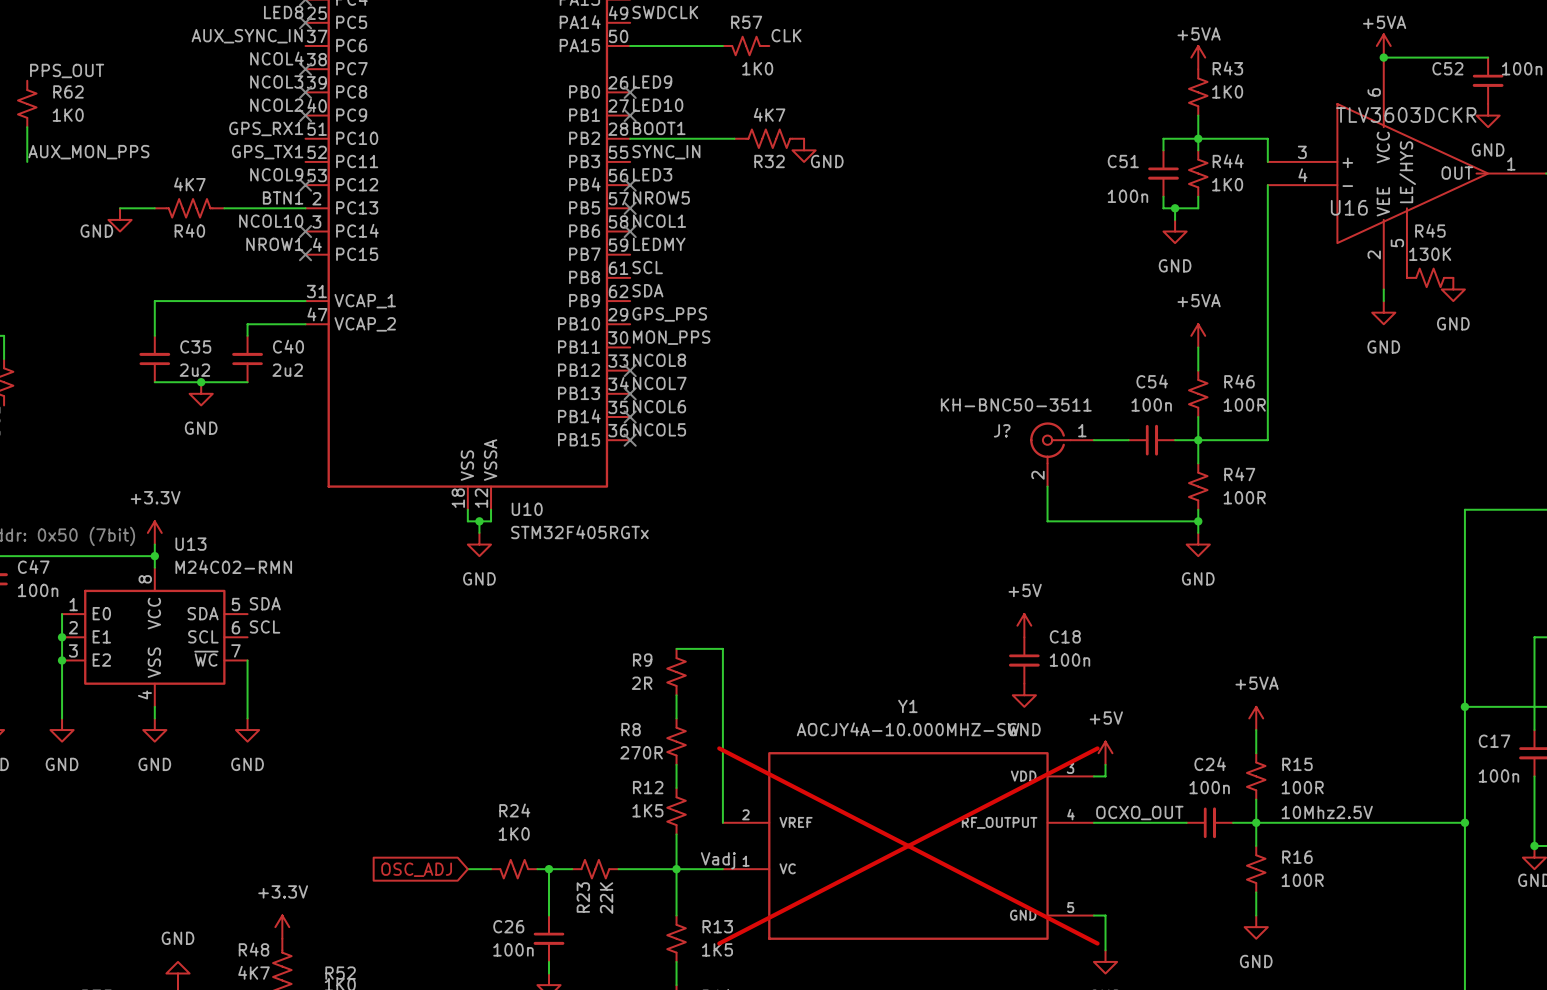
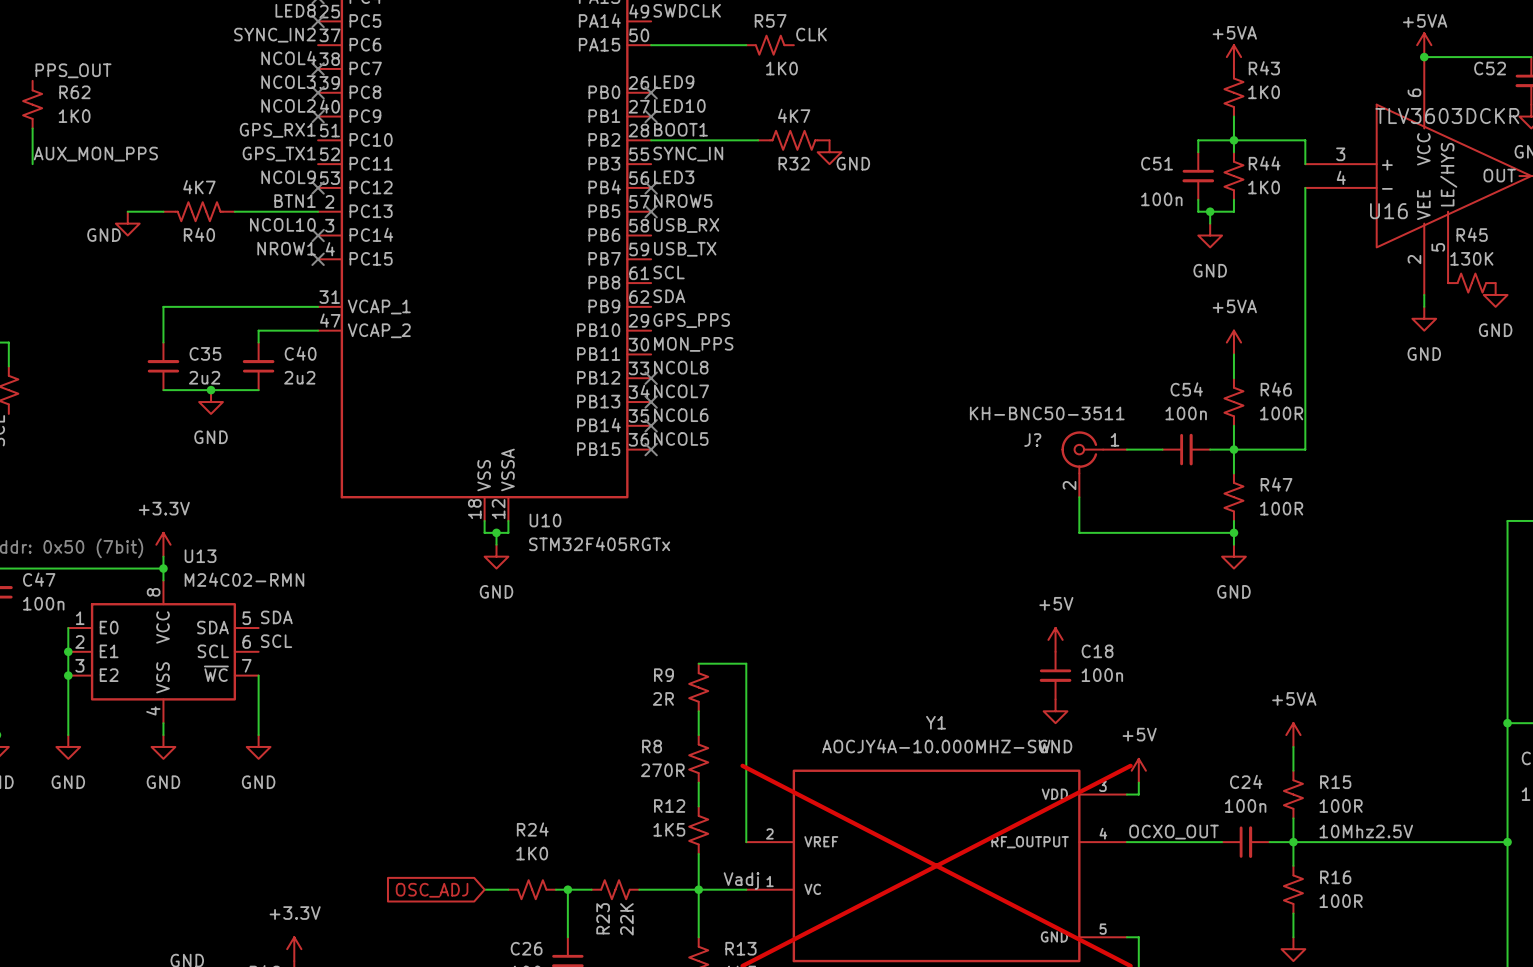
label: AUX_SYNC_IN (247, 36) -> SYNC_IN2 (274, 35)
label: NCOL1 (659, 221) -> USB_RX (686, 225)
no-connect mark: (630, 231) -> none
label: LEDMY (659, 244) -> USB_TX (685, 249)

